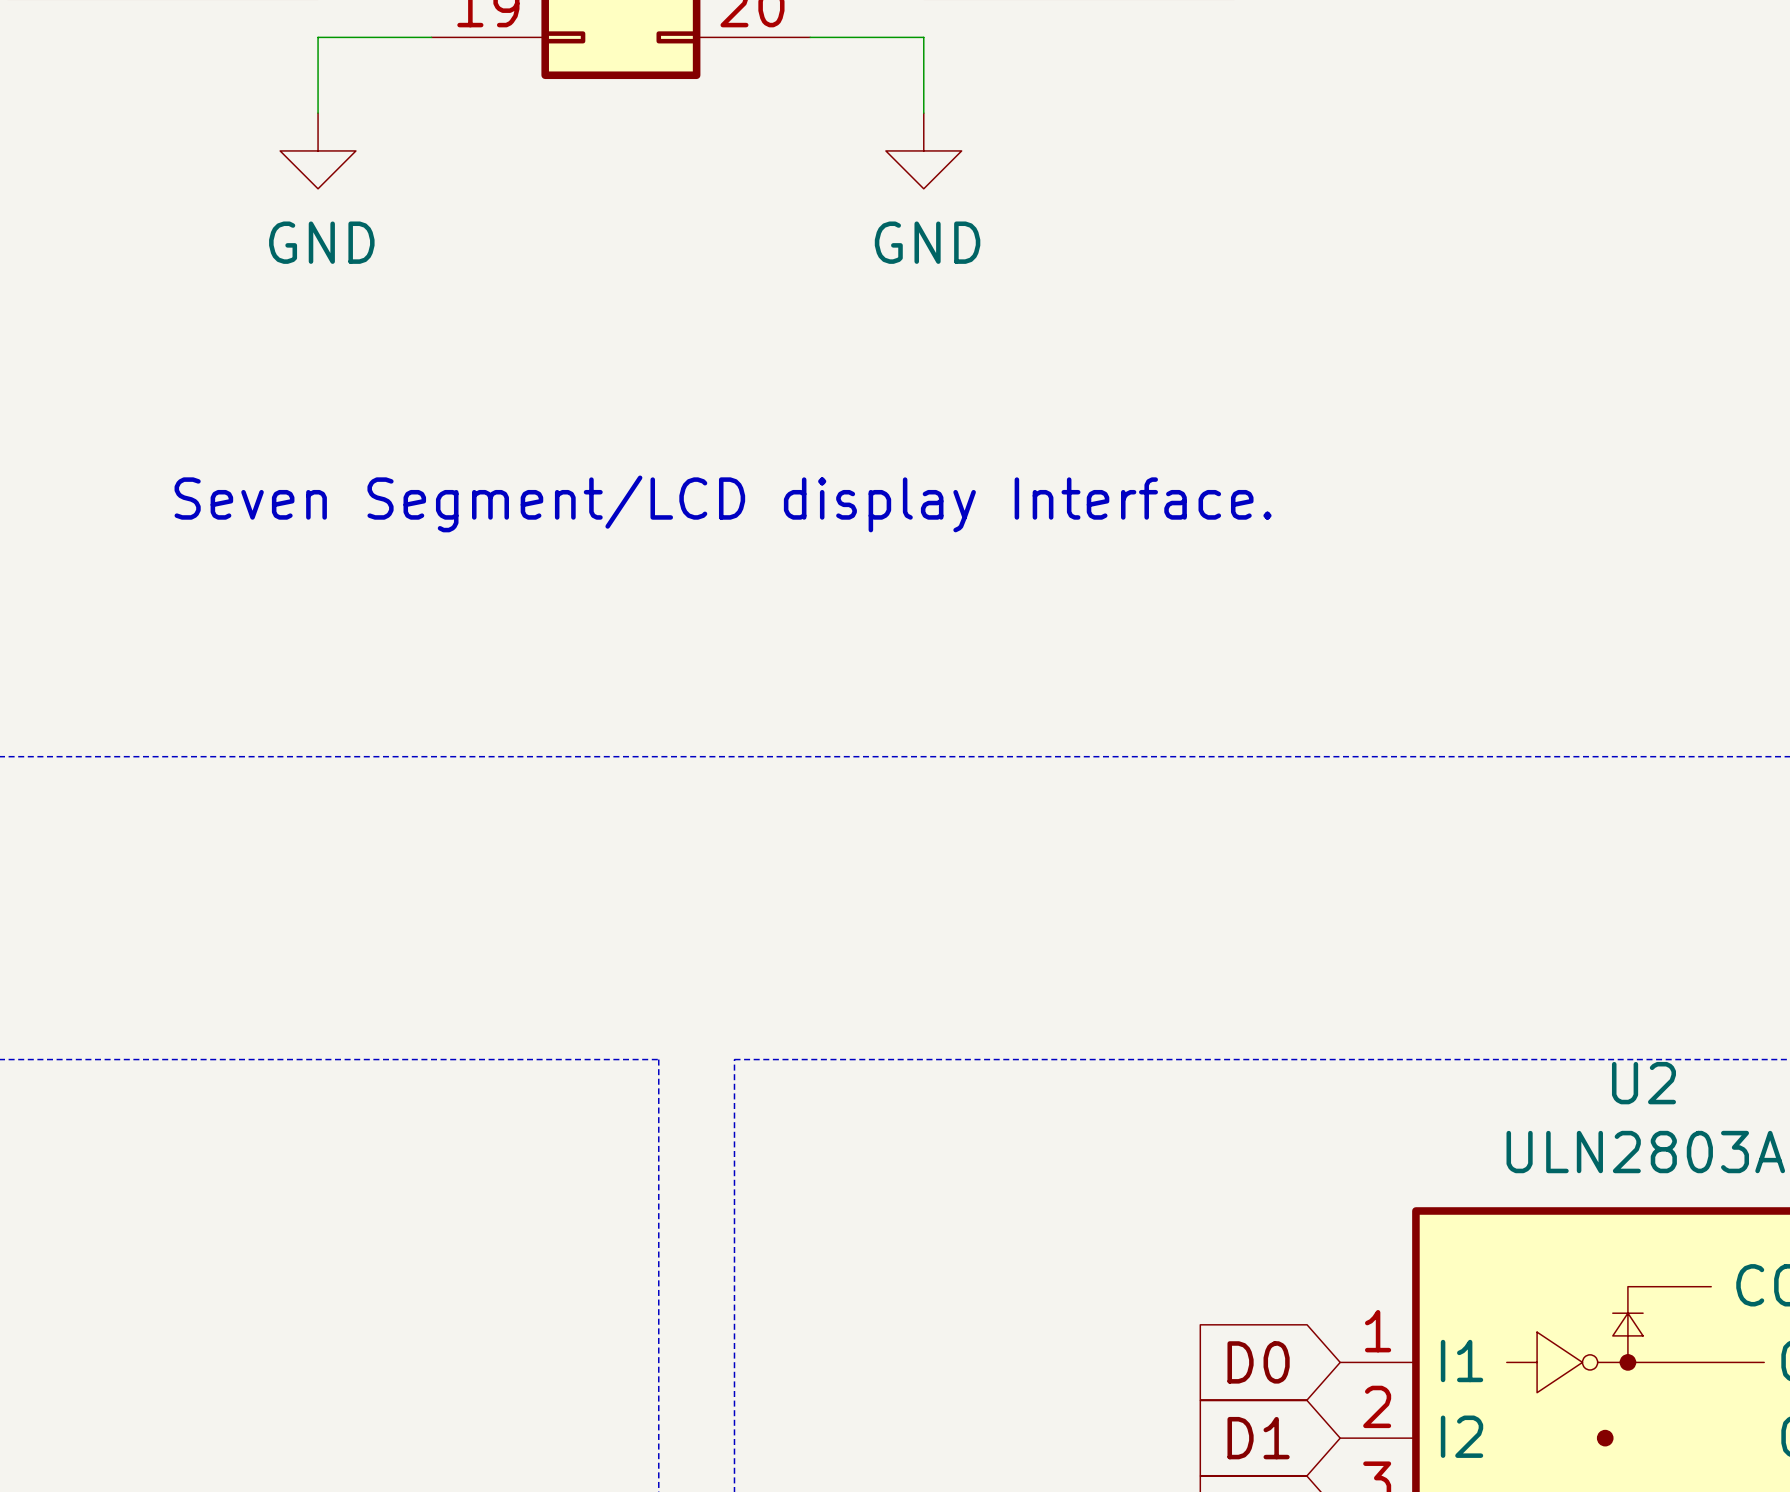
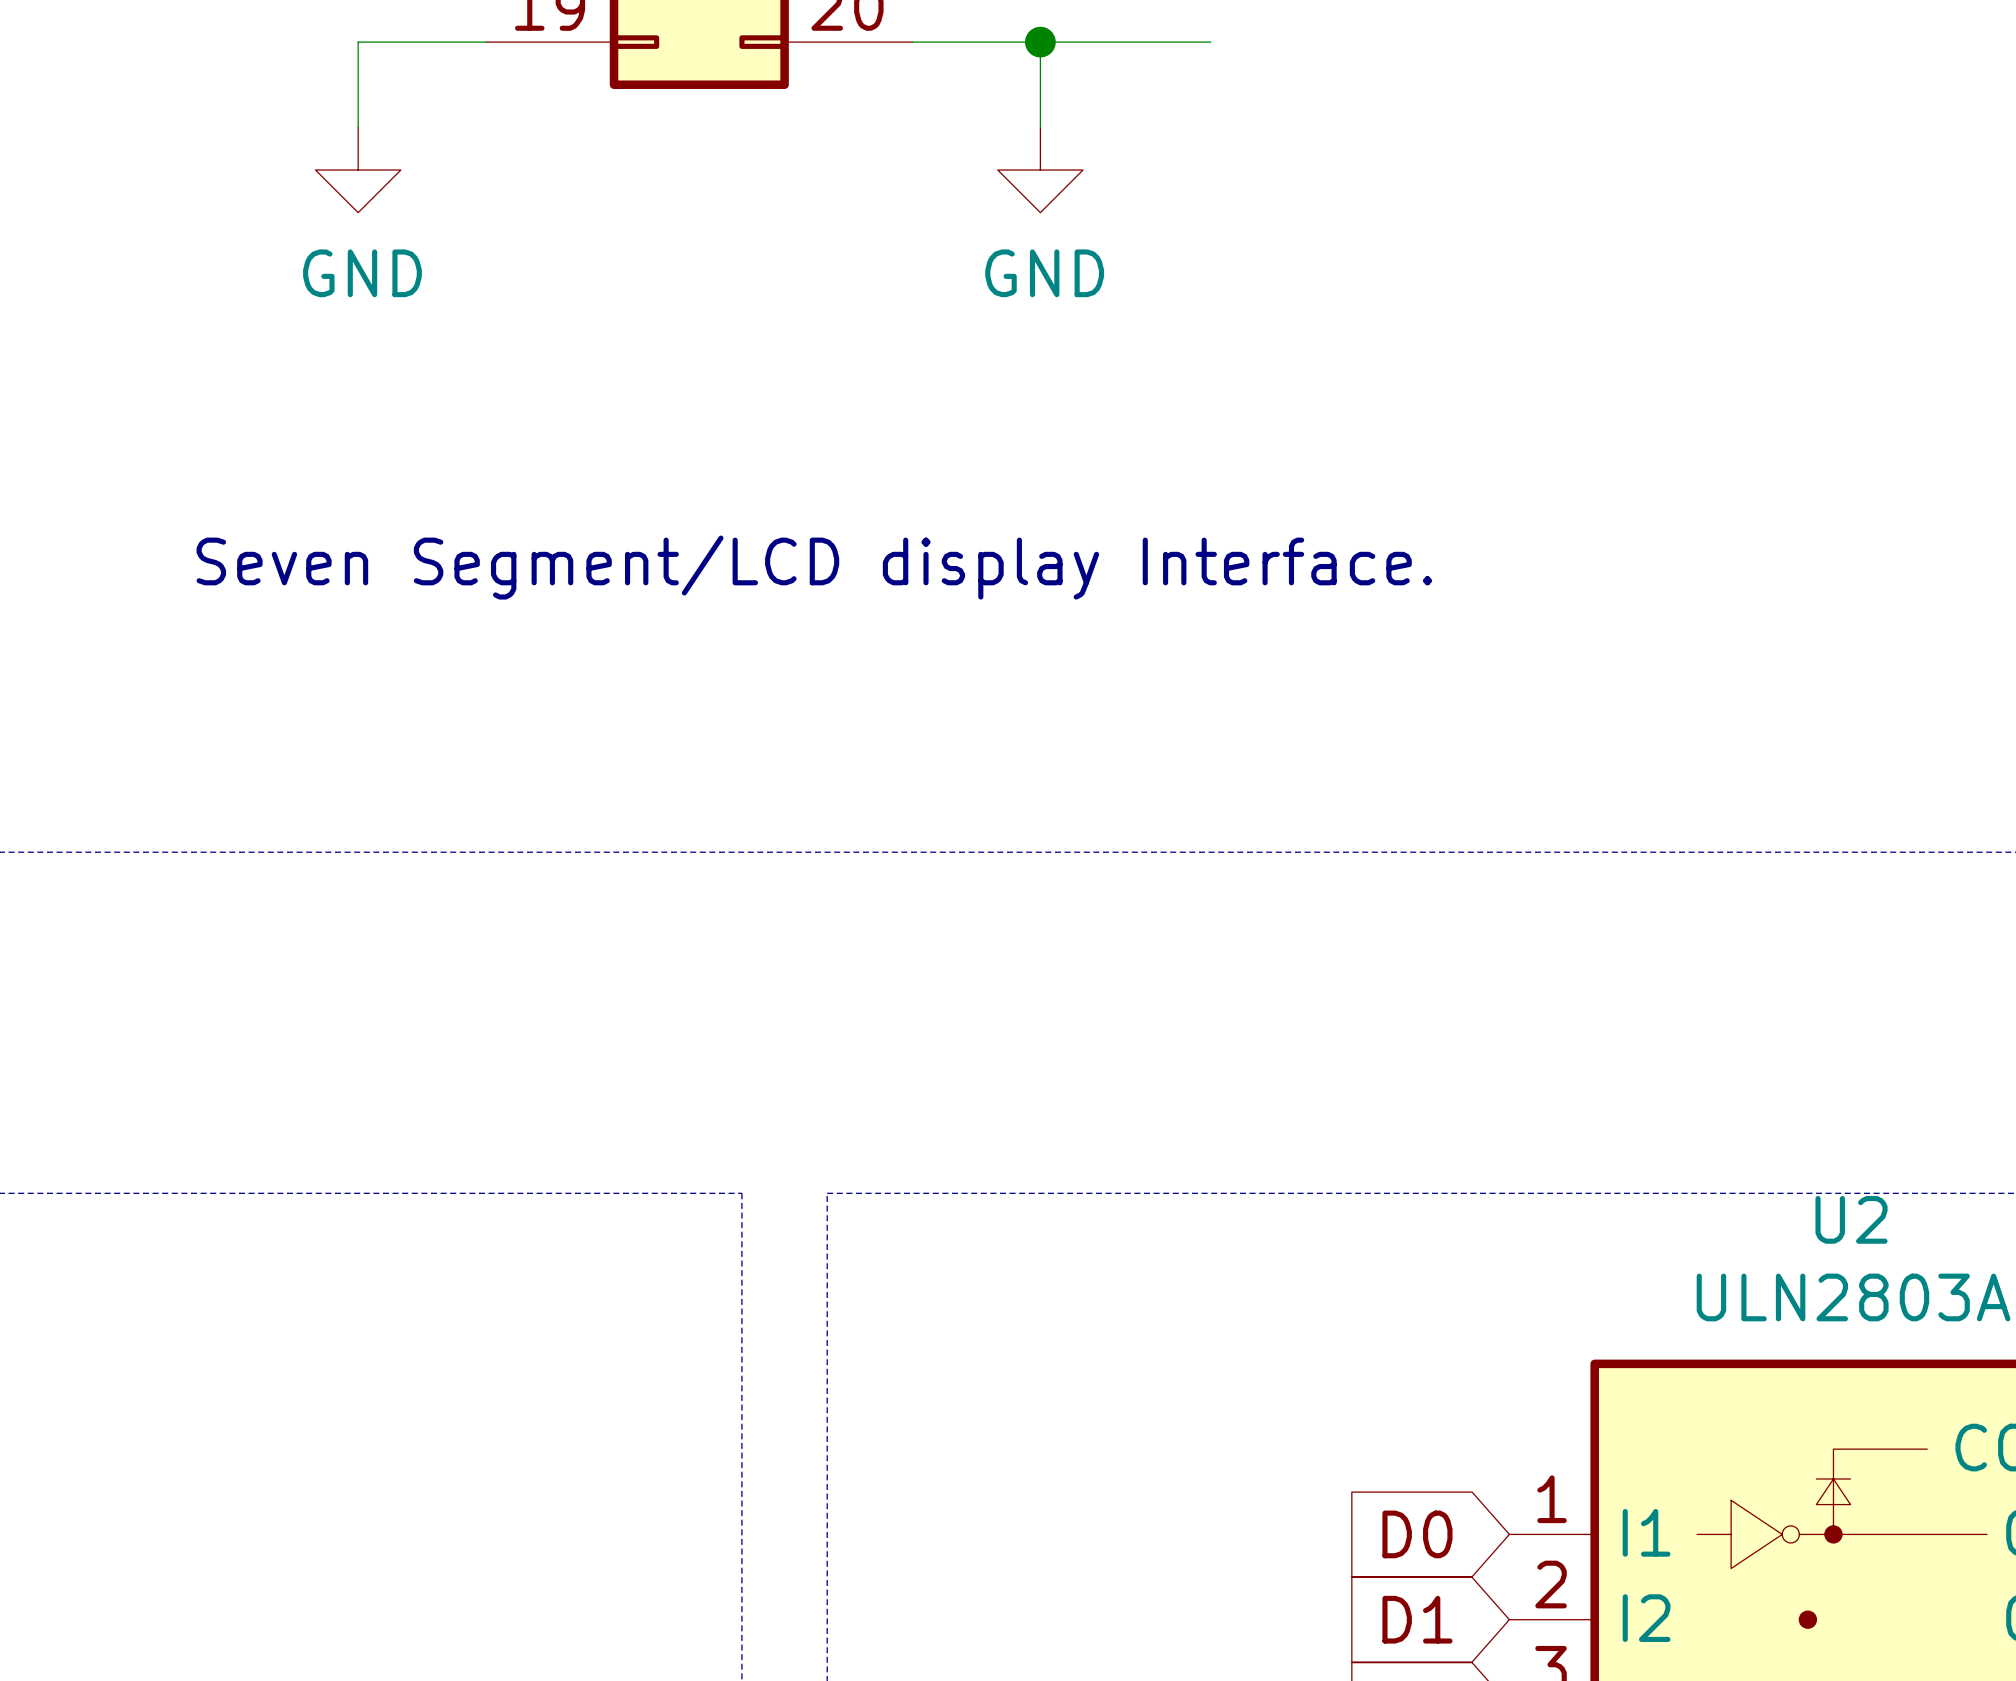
wire: none -> (1040, 42) (1210, 42)
junction: none -> (1040, 42)

